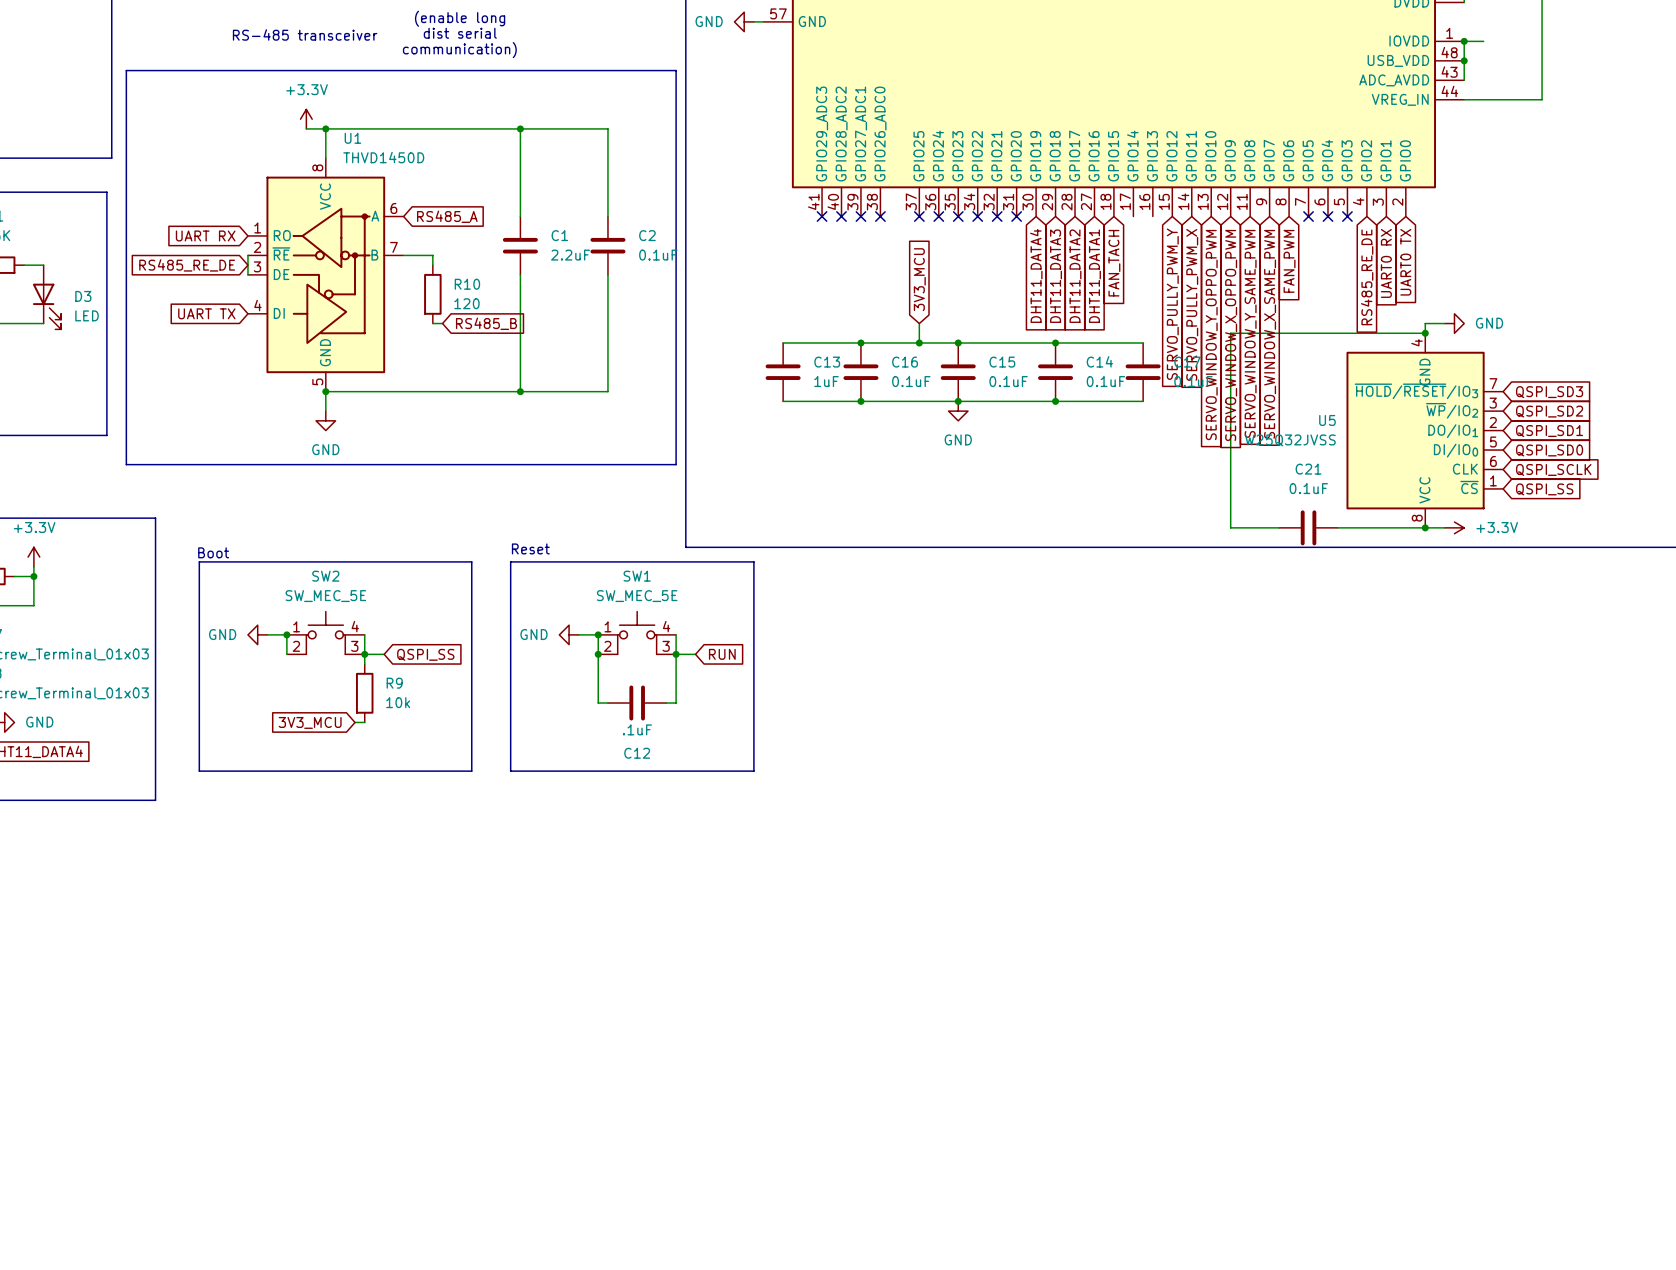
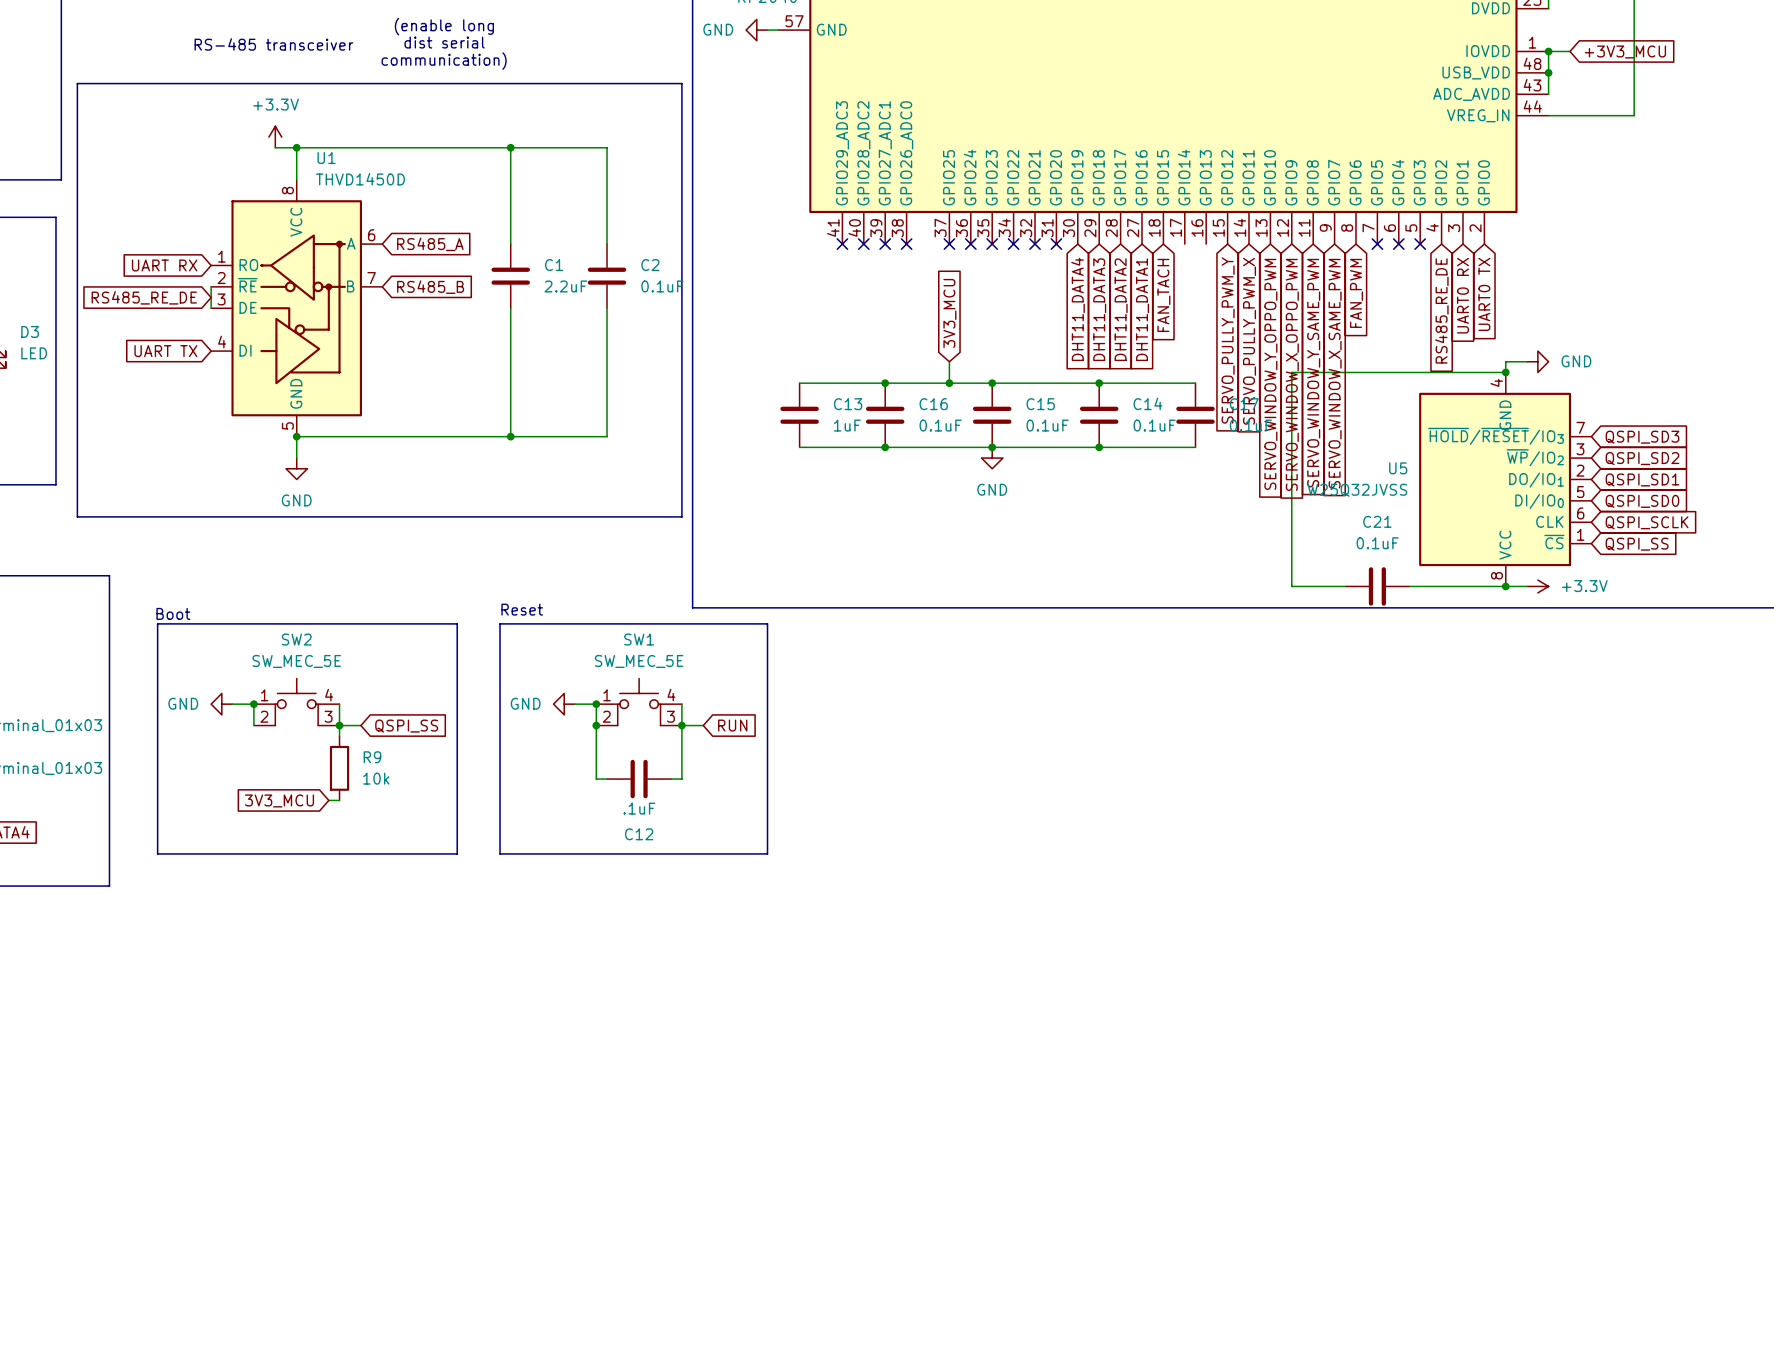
global label: none -> +3V3_MCU (1625, 51)
wire: (403, 255) (432, 255) (432, 265) -> none
R10: 120 (432, 294) -> none
wire: (432, 323) (442, 323) -> none
global label position: RS485_B (486, 323) -> RS485_B (430, 287)

